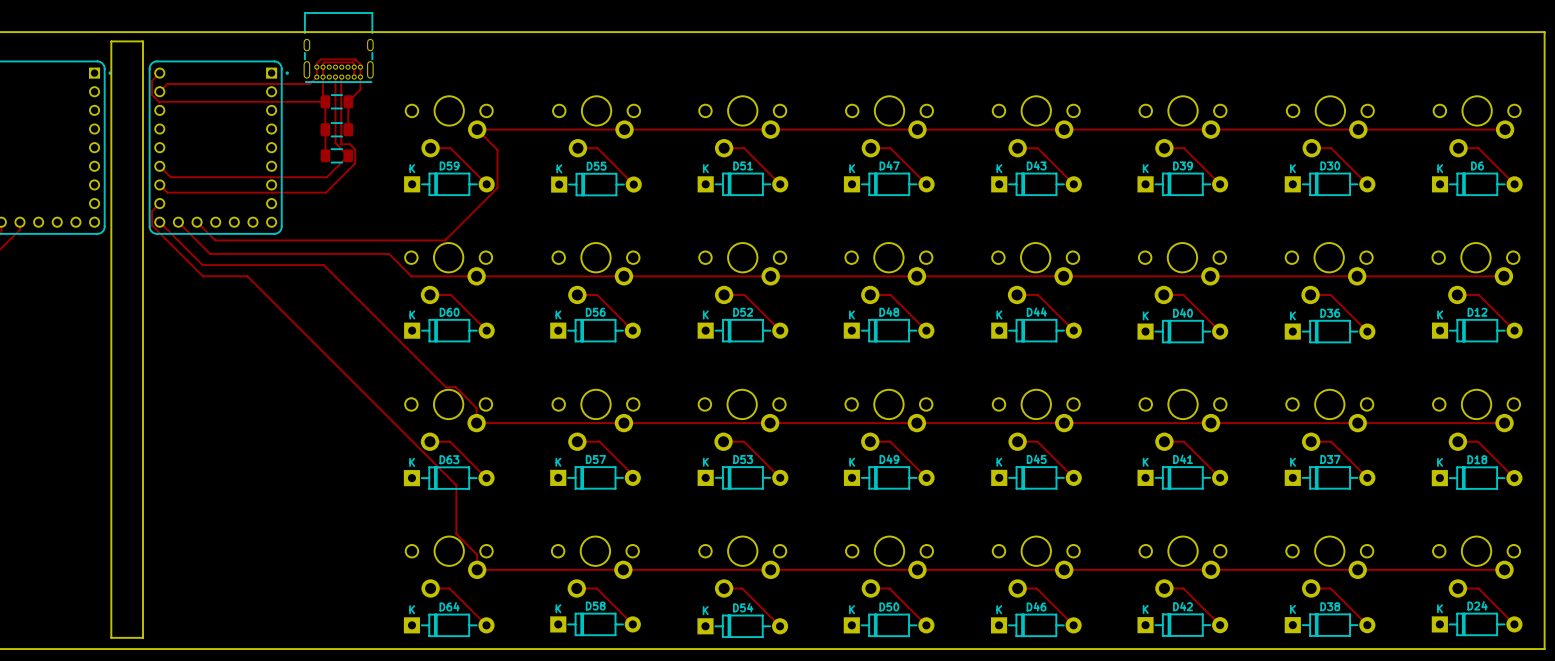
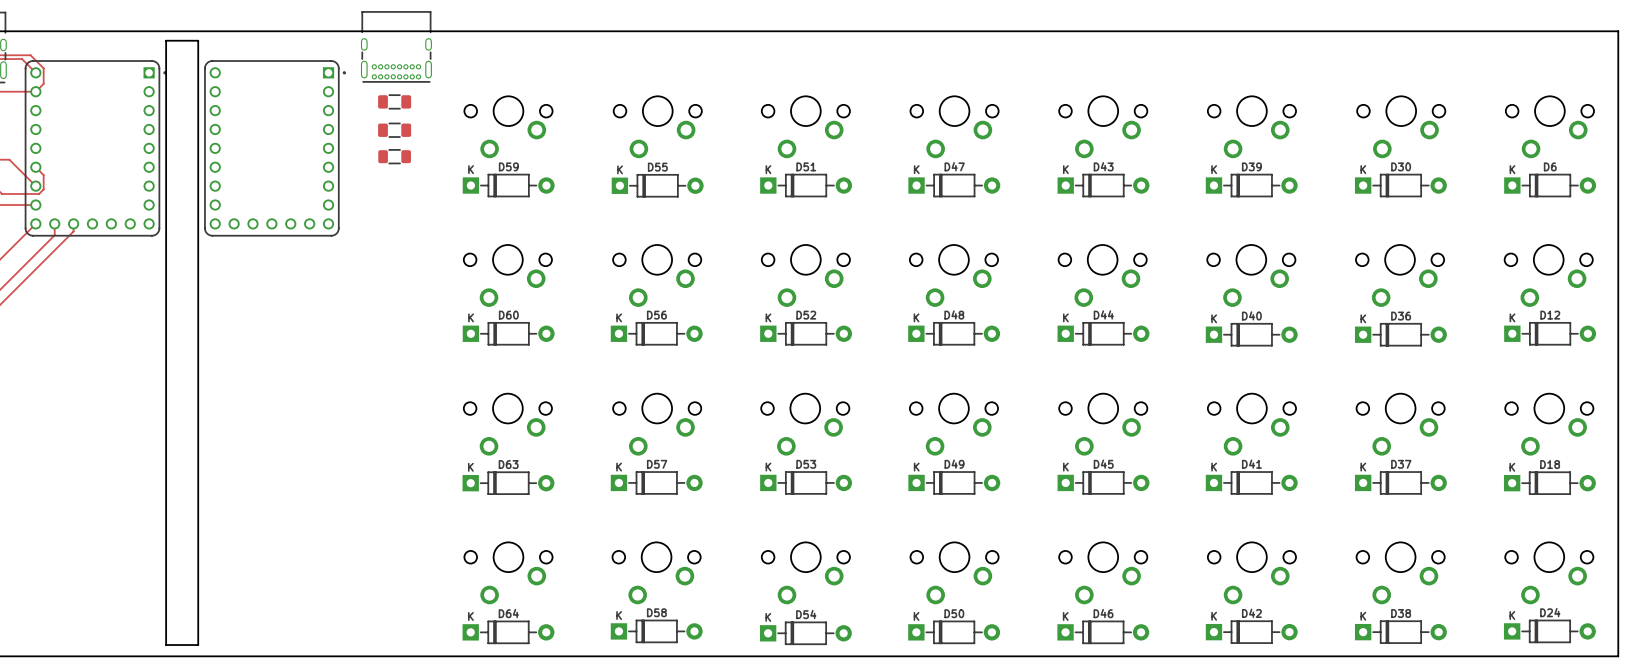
track: (159, 73) (152, 80) (152, 94) (158, 101) (325, 101) -> none
track: (335, 77) (335, 143) (348, 155) (326, 177) (170, 177) (159, 166) -> none
track: (341, 77) (341, 144) (349, 144) (355, 149) (355, 163) (326, 192) (167, 192) (159, 184) -> none
track: (354, 77) (352, 62) (324, 62) (323, 99) (325, 101) -> none
track: (159, 91) (167, 84) (309, 84) (316, 77) (316, 63) (320, 59) (355, 59) (360, 64) (360, 89) (348, 101) (348, 129) -> none
track: (325, 101) (325, 129) -> none
track: (325, 129) (325, 155) -> none
track: (1505, 129) (477, 129) (497, 149) (497, 188) (445, 240) (215, 240) (197, 222) -> none
track: (430, 148) (450, 148) (486, 184) -> none
track: (577, 148) (597, 148) (633, 184) -> none
track: (724, 148) (744, 148) (780, 184) -> none
track: (870, 148) (890, 148) (926, 184) -> none
track: (1017, 148) (1037, 148) (1073, 184) -> none
track: (1164, 148) (1183, 148) (1220, 184) -> none
track: (1311, 148) (1331, 148) (1367, 184) -> none
track: (1458, 148) (1478, 148) (1514, 184) -> none
track: (159, 203) (152, 211) (152, 225) (202, 276) (247, 276) (456, 485) (456, 533) (477, 554) (477, 569) (1504, 569) -> none
track: (159, 222) (202, 265) (323, 265) (445, 387) (455, 387) (476, 408) (476, 423) (1504, 423) -> none
track: (178, 222) (210, 253) (389, 253) (411, 276) (1503, 276) -> none
track: (430, 294) (451, 294) (486, 330) -> none
track: (577, 294) (597, 294) (632, 330) -> none
track: (724, 294) (744, 294) (780, 330) -> none
track: (870, 294) (890, 294) (926, 330) -> none
track: (1017, 294) (1038, 294) (1073, 330) -> none
track: (1163, 294) (1183, 294) (1220, 331) -> none
track: (1310, 294) (1330, 294) (1367, 331) -> none
track: (1457, 294) (1478, 294) (1514, 330) -> none
track: (430, 441) (450, 441) (486, 478) -> none
track: (577, 441) (599, 441) (635, 477) -> none
track: (723, 441) (744, 441) (780, 477) -> none
track: (870, 441) (890, 441) (926, 477) -> none
track: (1017, 441) (1037, 441) (1073, 477) -> none
track: (1164, 441) (1183, 441) (1220, 477) -> none
track: (1311, 441) (1331, 441) (1367, 477) -> none
track: (1457, 441) (1478, 441) (1514, 478) -> none
track: (430, 588) (449, 588) (486, 625) -> none
track: (576, 588) (596, 588) (632, 624) -> none
track: (724, 588) (742, 588) (780, 626) -> none
track: (870, 588) (889, 588) (926, 625) -> none
track: (1017, 588) (1036, 588) (1073, 625) -> none
track: (1164, 588) (1183, 588) (1220, 625) -> none
track: (1311, 588) (1330, 588) (1367, 625) -> none
track: (1457, 588) (1478, 588) (1514, 624) -> none

